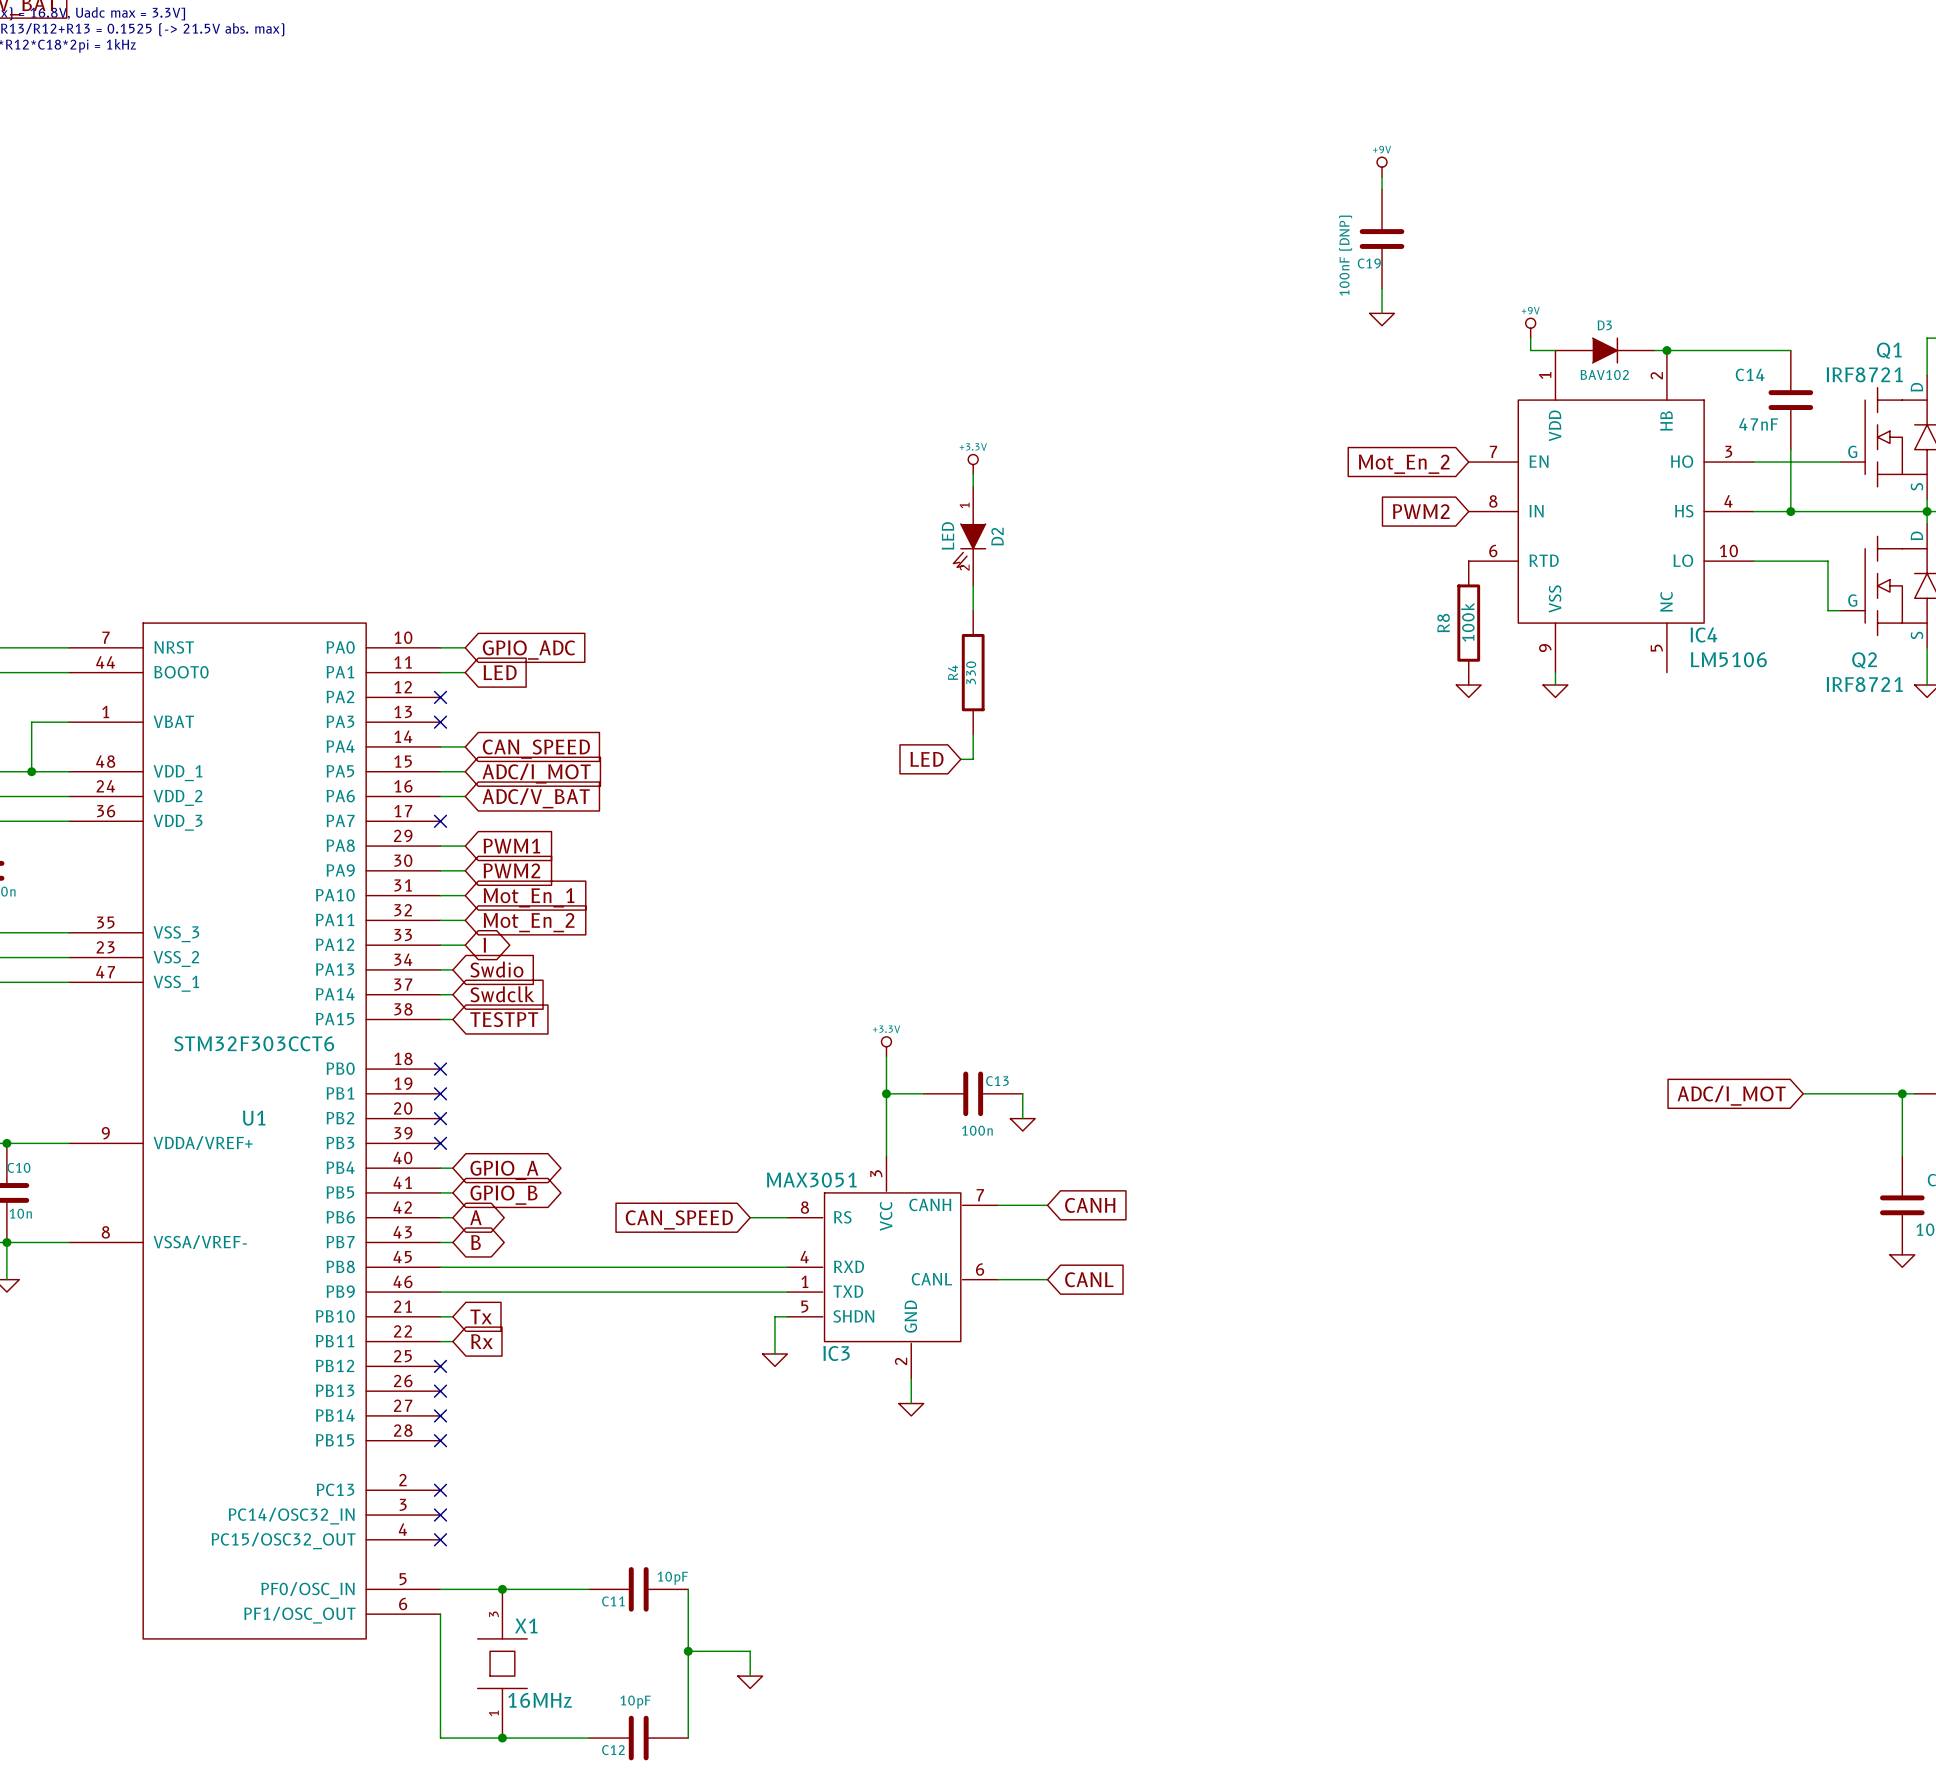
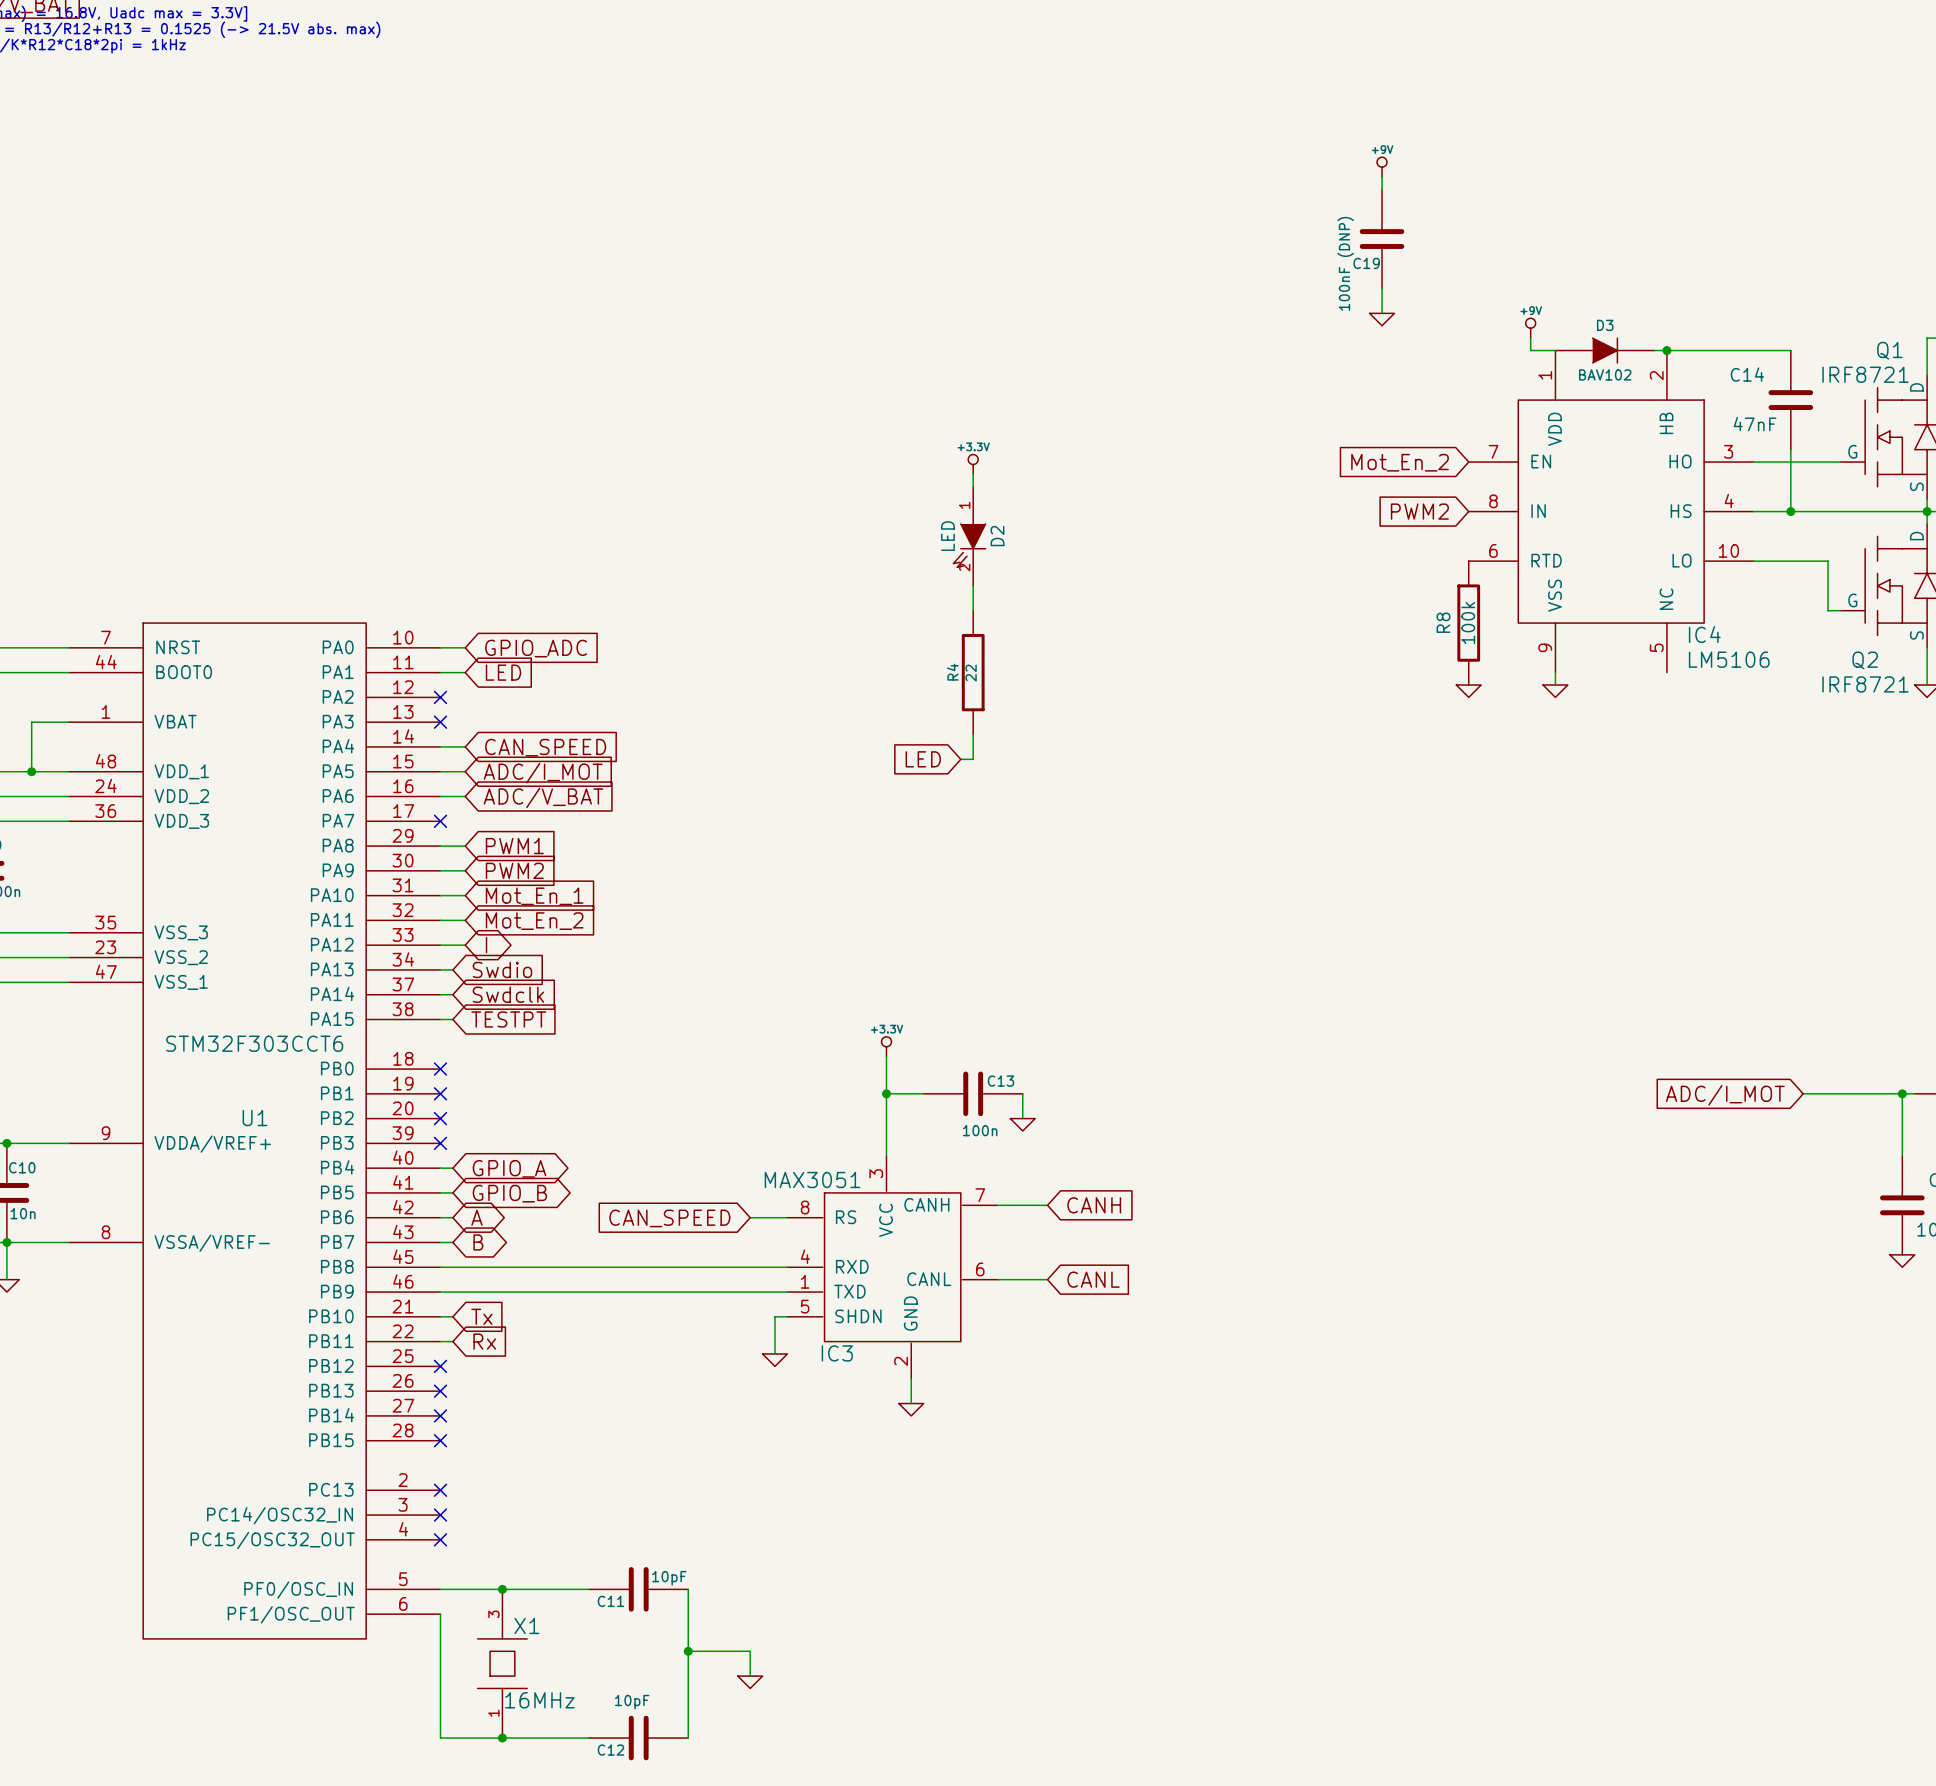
R4 value: 330 (971, 672) -> 22 (971, 673)

